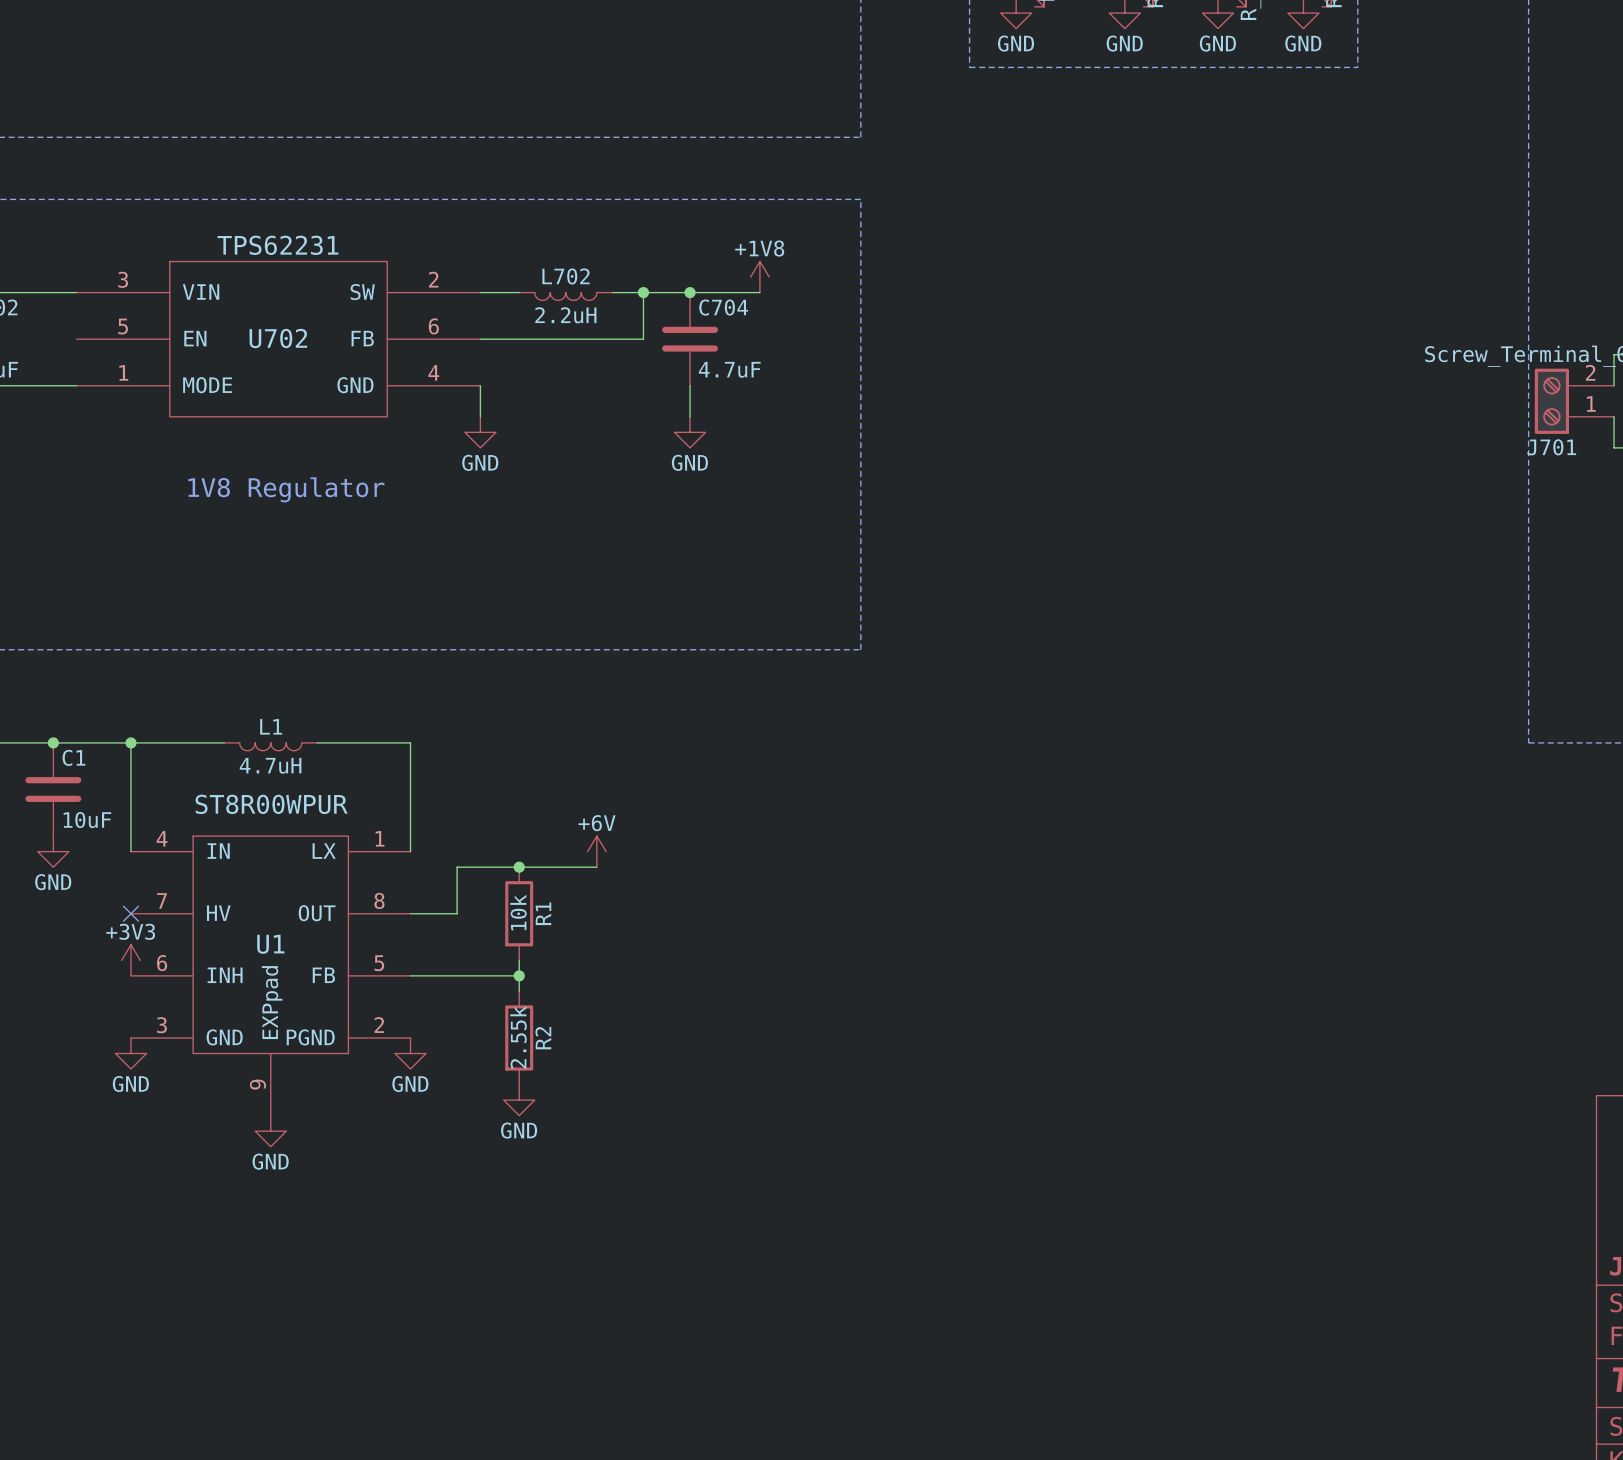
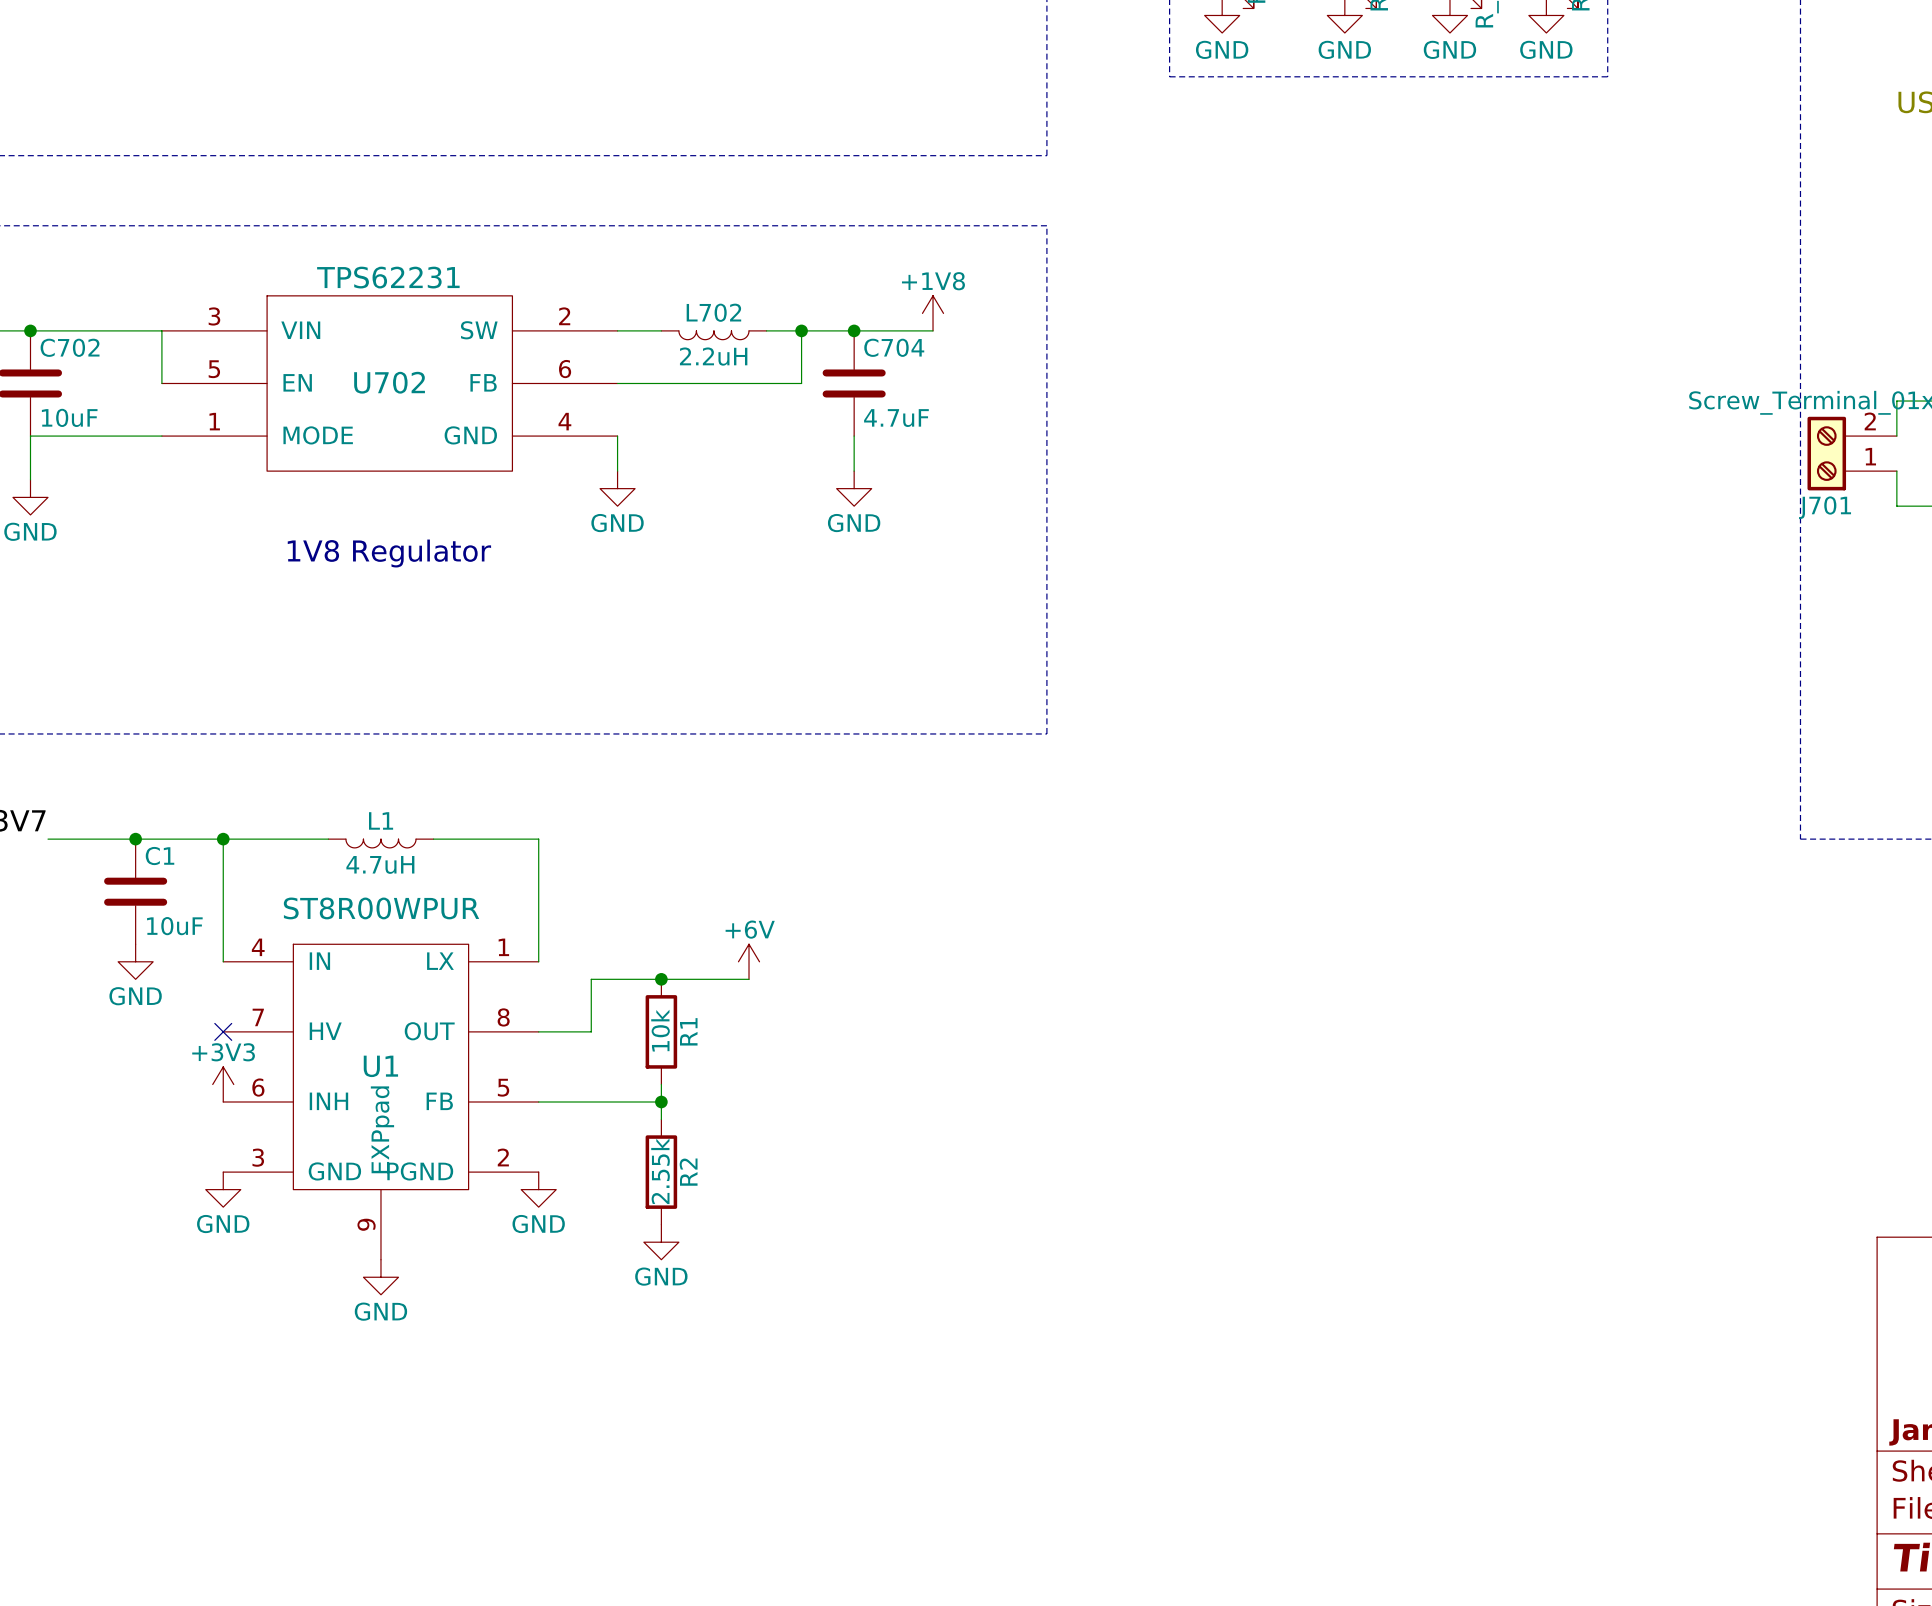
wire: none -> (161, 330) (161, 383)

